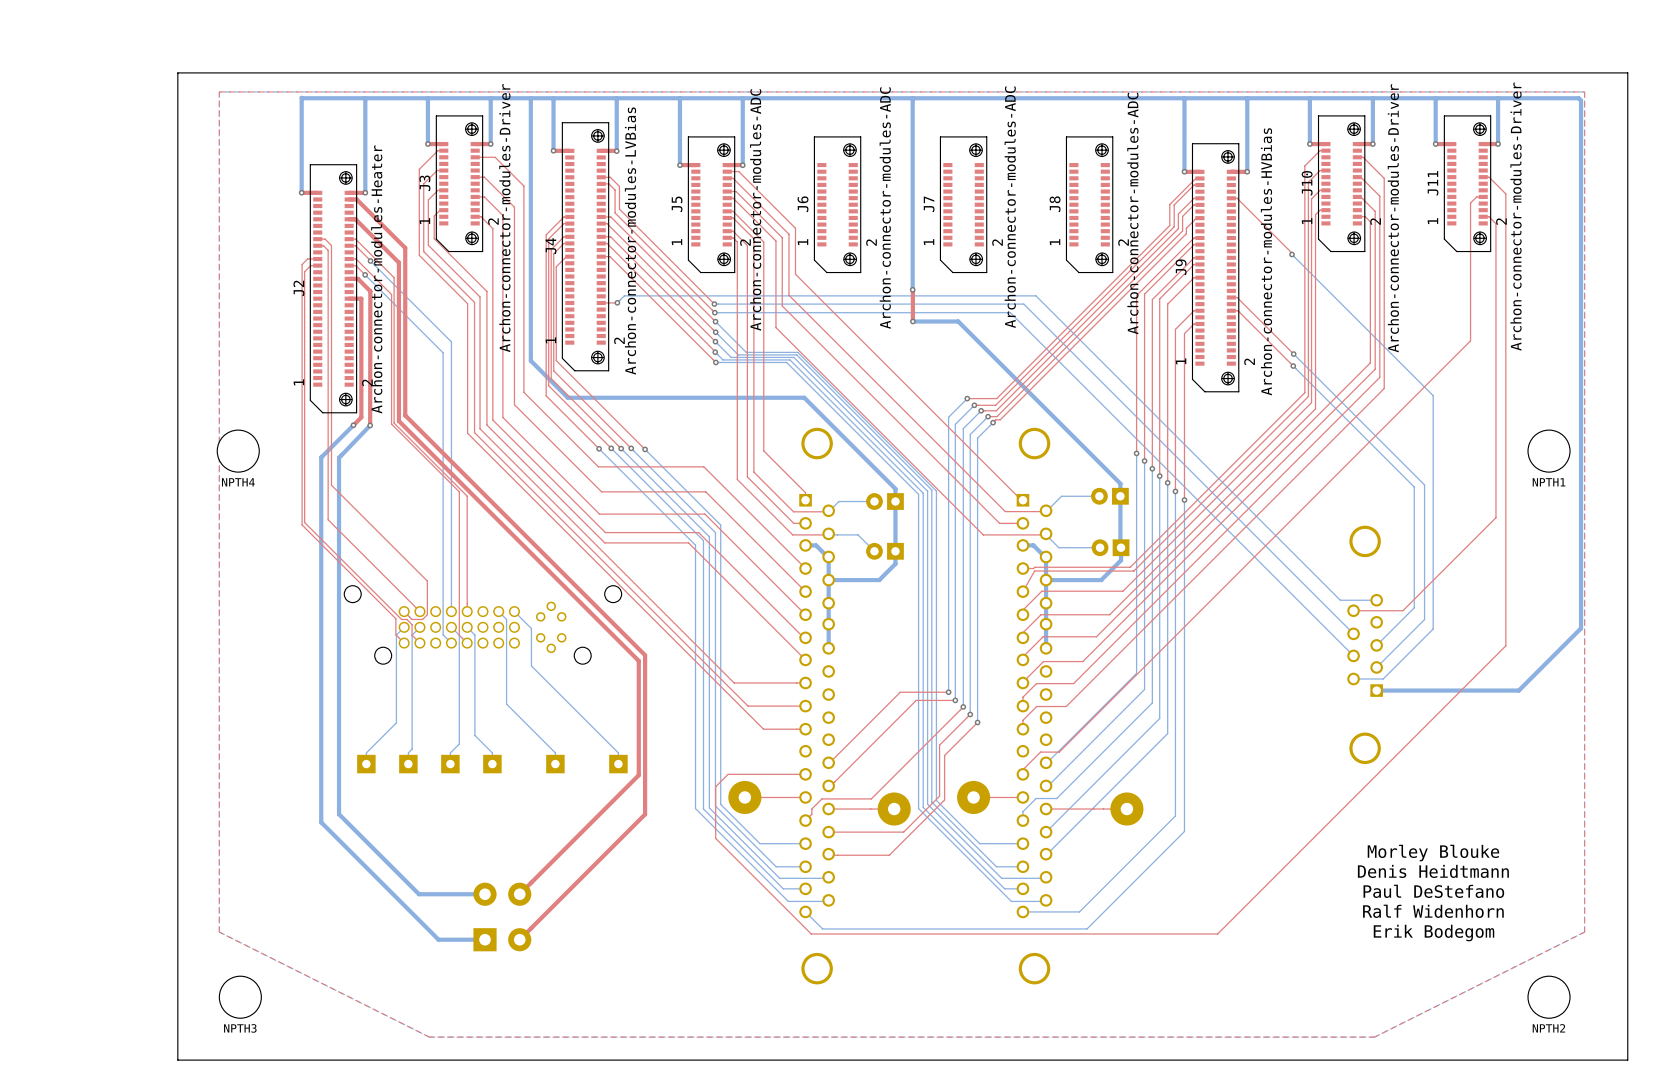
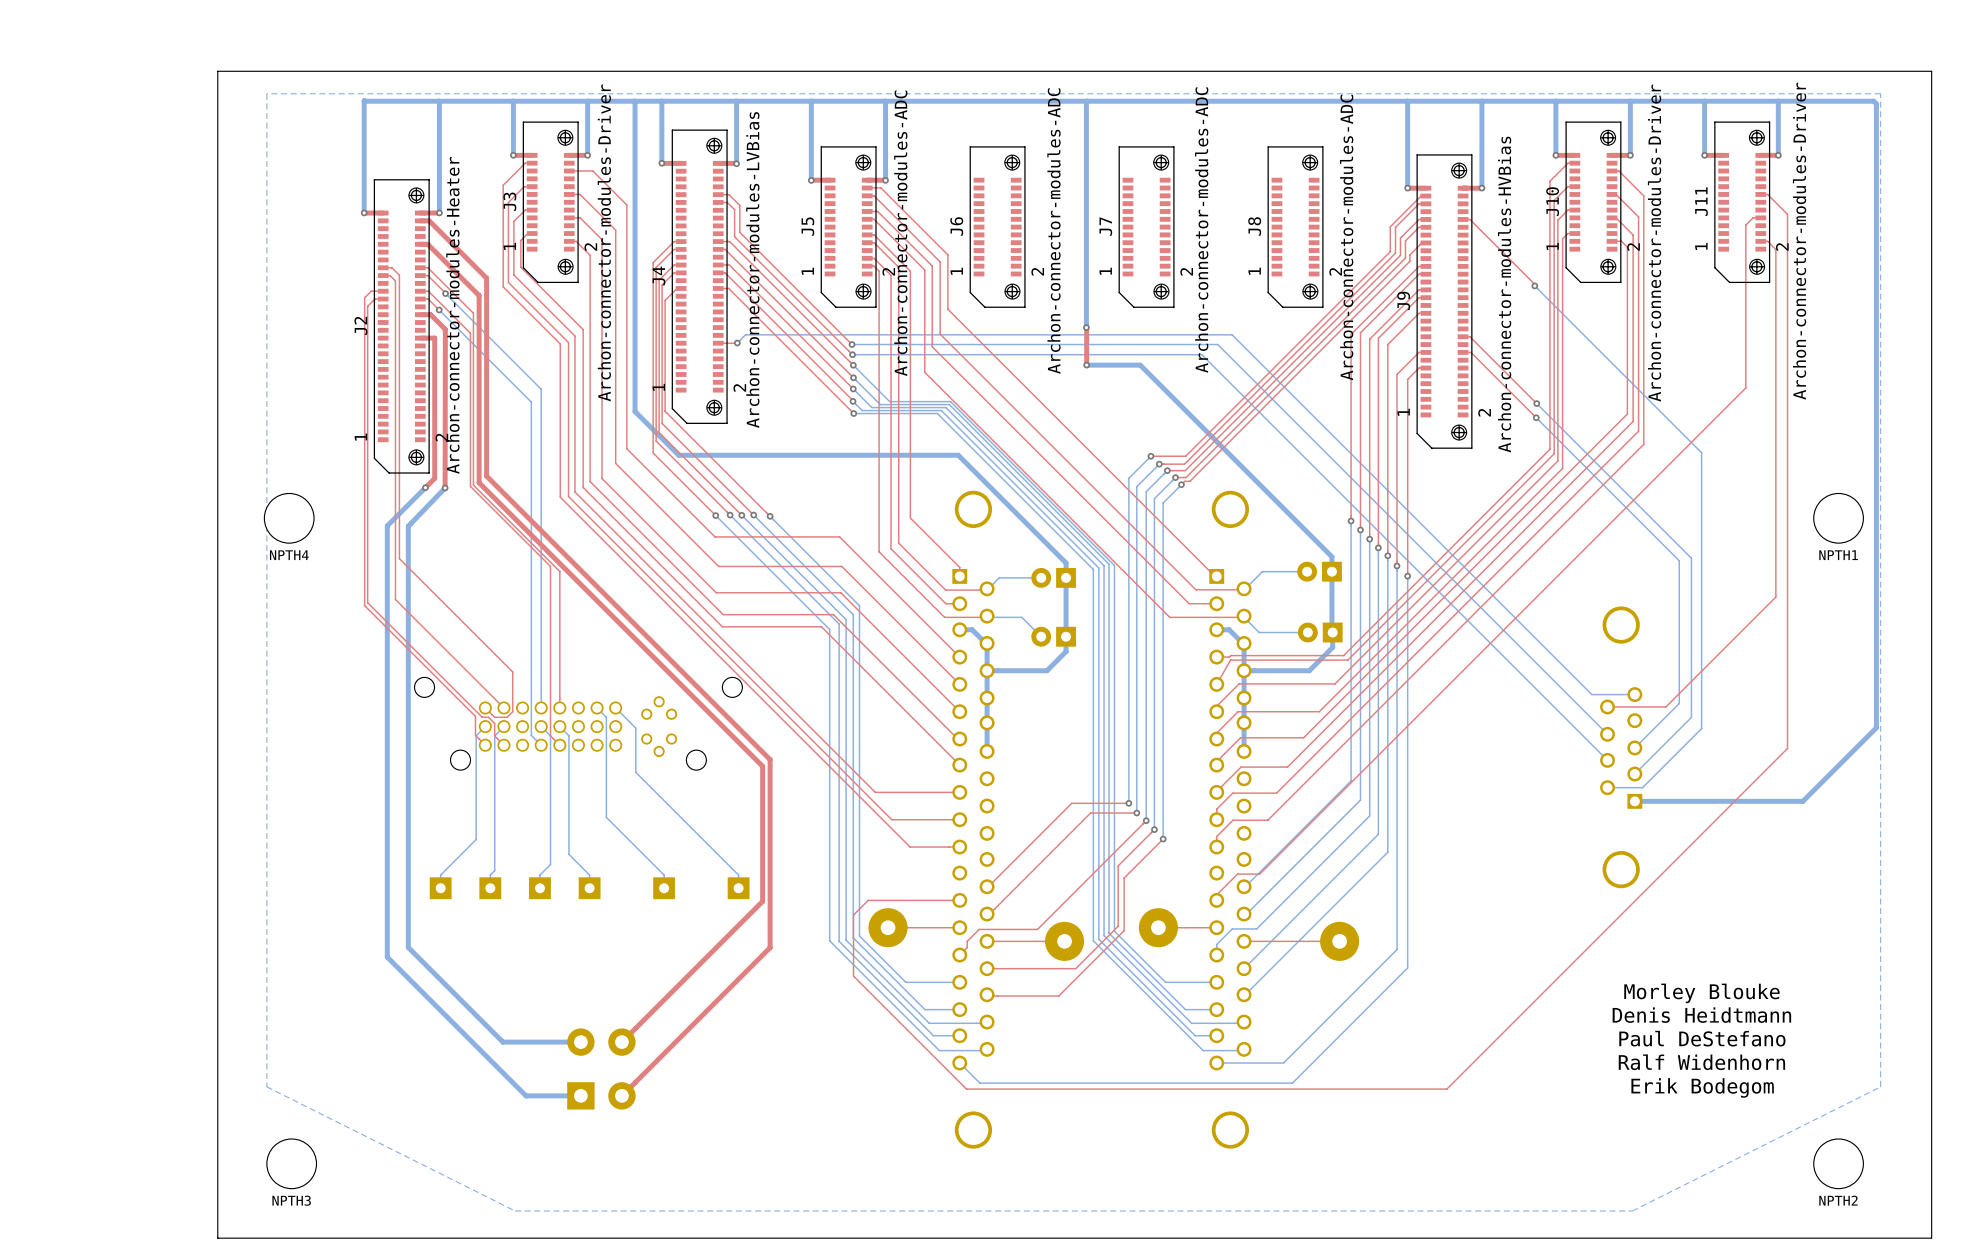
top zone outline: (219, 91) (219, 932) (429, 1037) (1374, 1037) (1584, 932) (1584, 91) (219, 91) -> none

